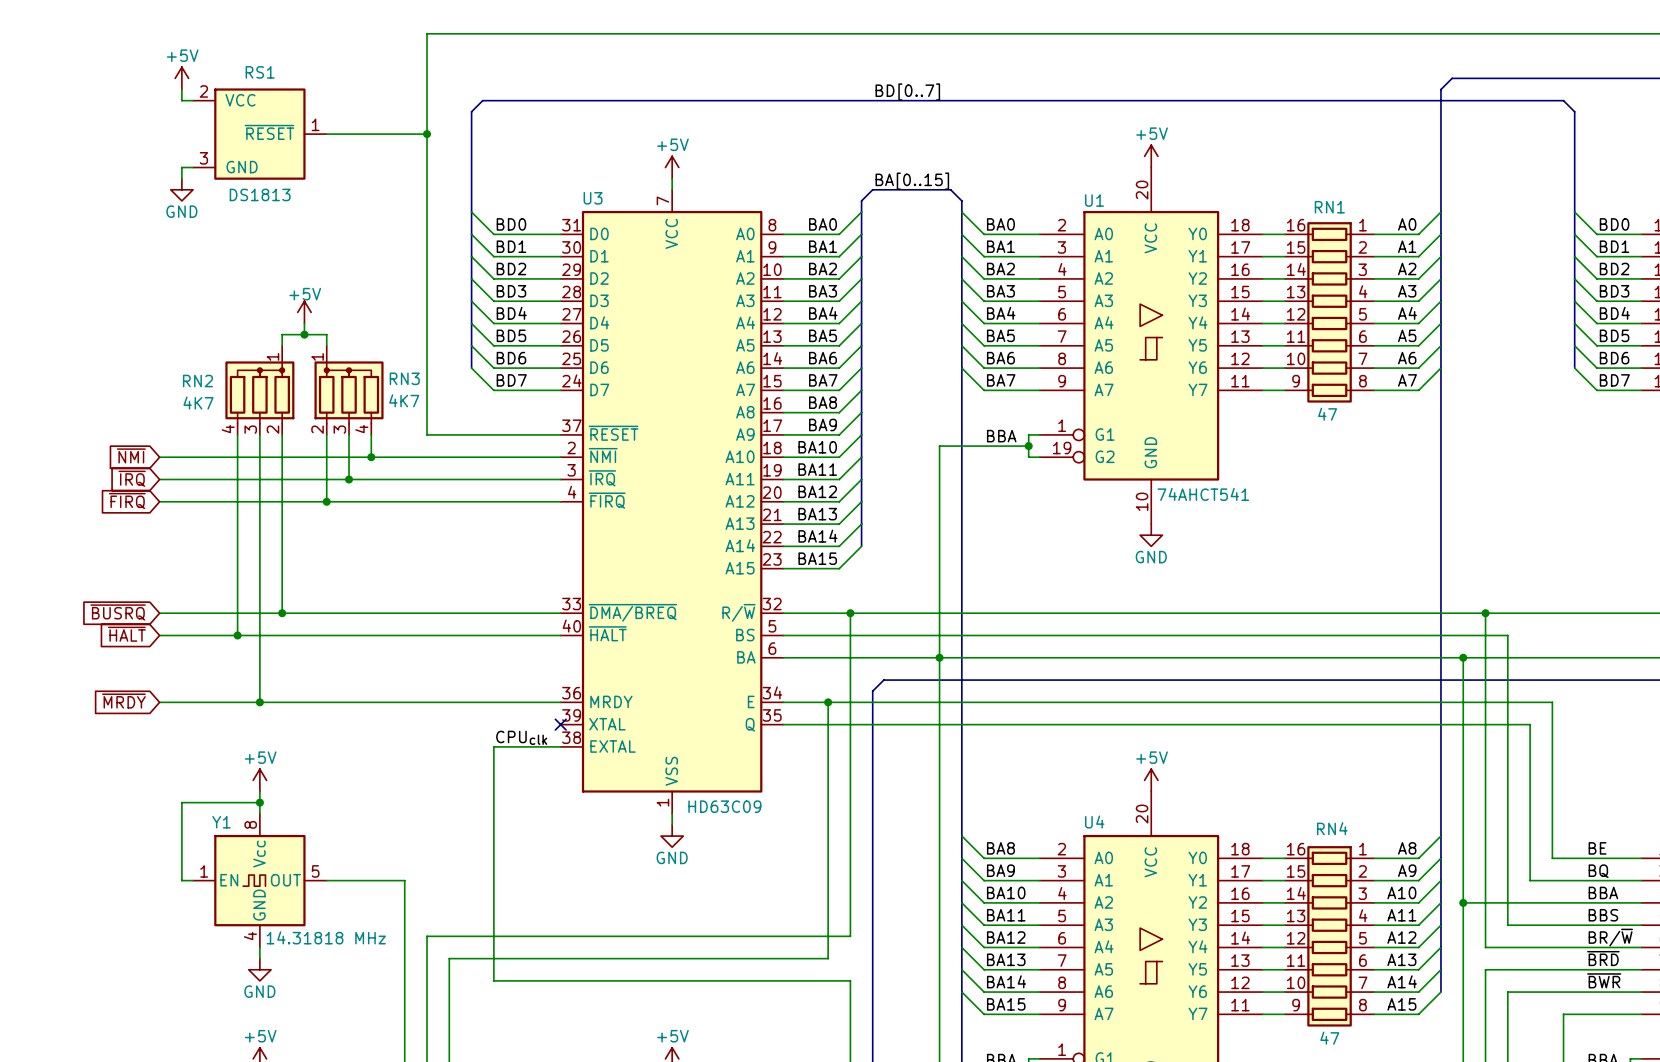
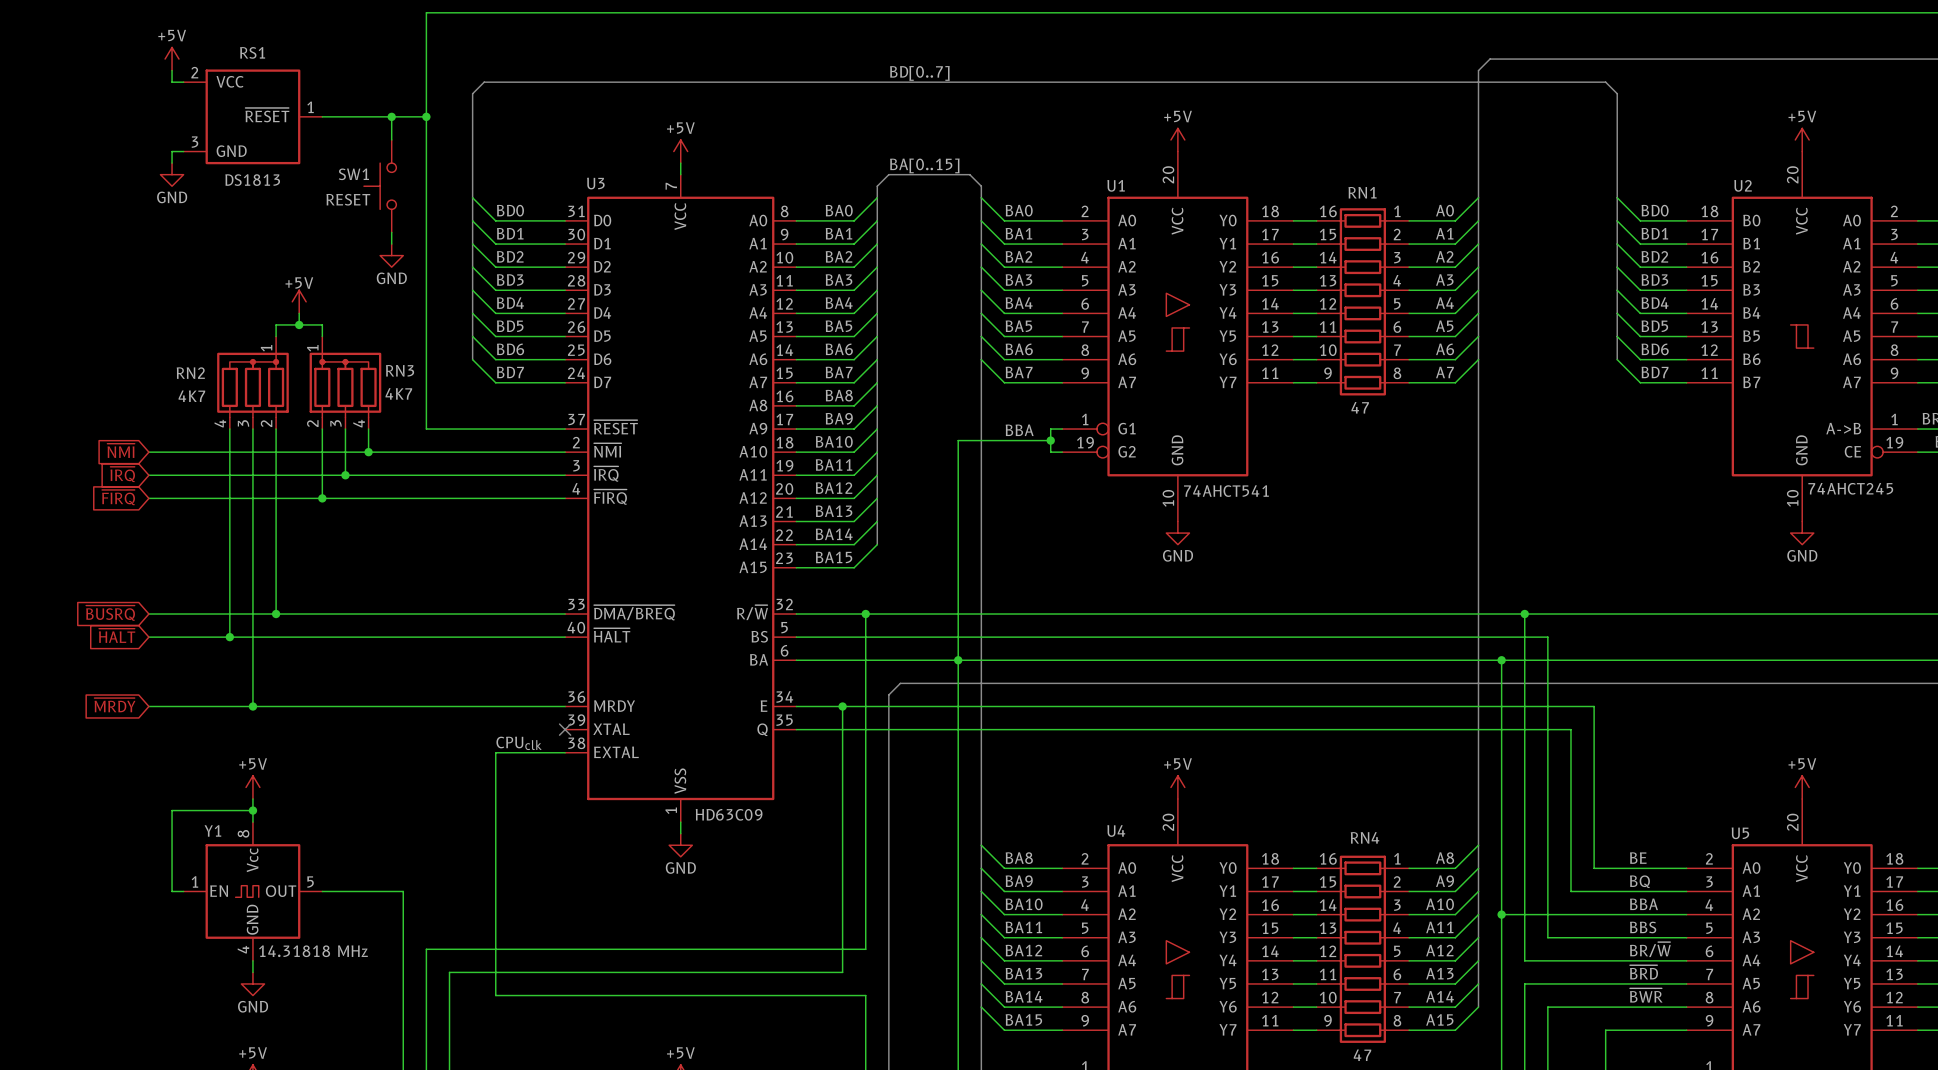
wire: none -> (391, 116) (391, 139)
junction: none -> (391, 116)
SW1: none -> RESET (380, 186)
wire: none -> (391, 232) (391, 244)
power symbol: none -> GND (391, 255)

